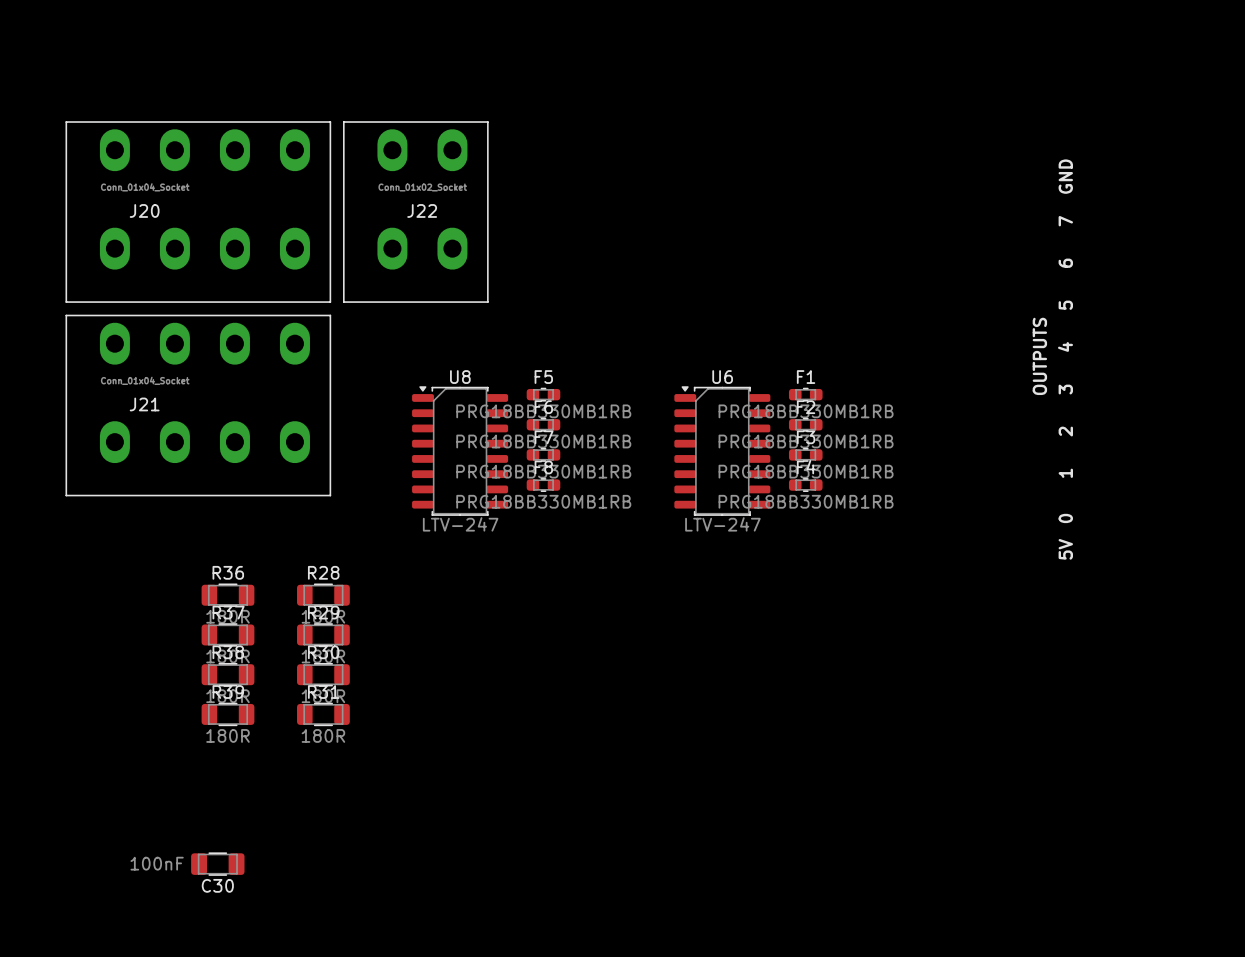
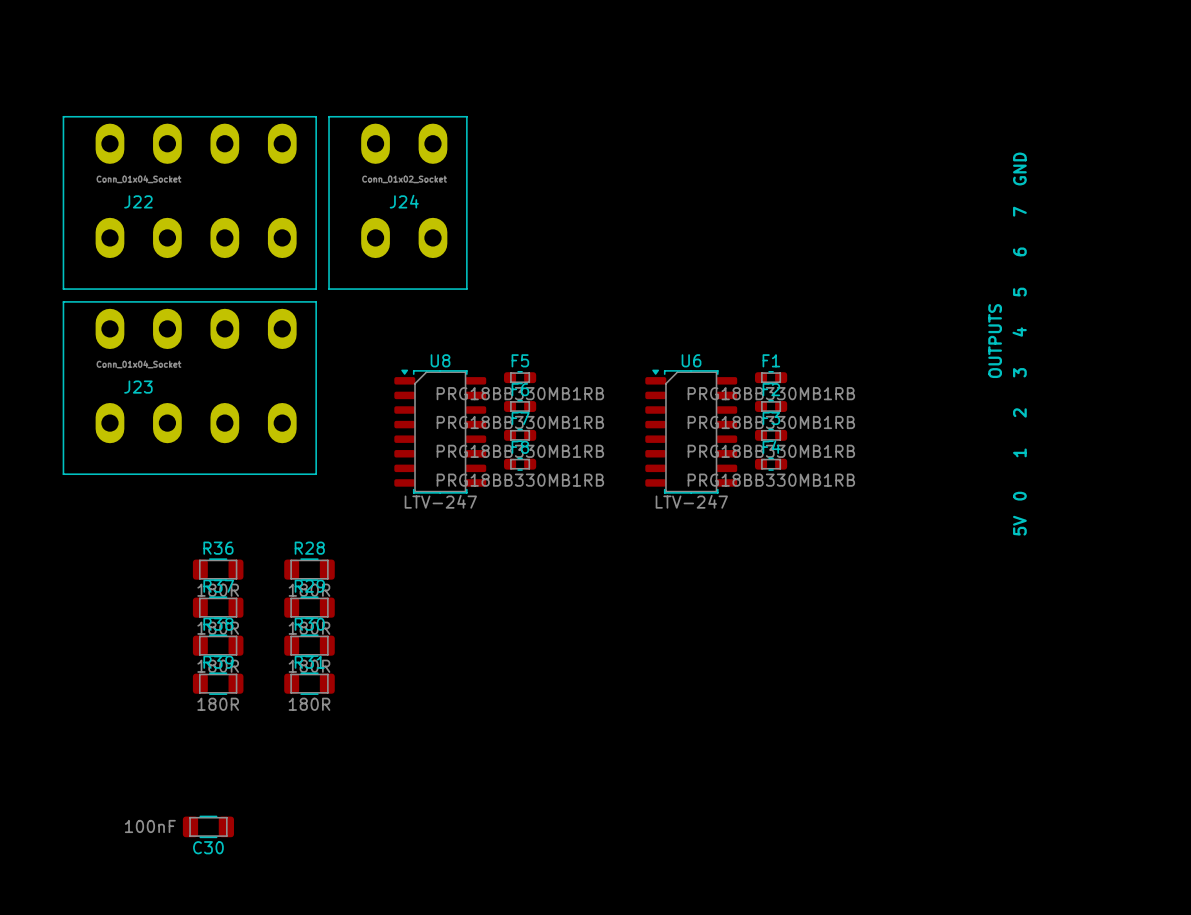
J20 name: J20 (144, 210) -> J22 (138, 201)
J22 name: J22 (422, 210) -> J24 (404, 201)
J21 name: J21 (144, 404) -> J23 (138, 387)

